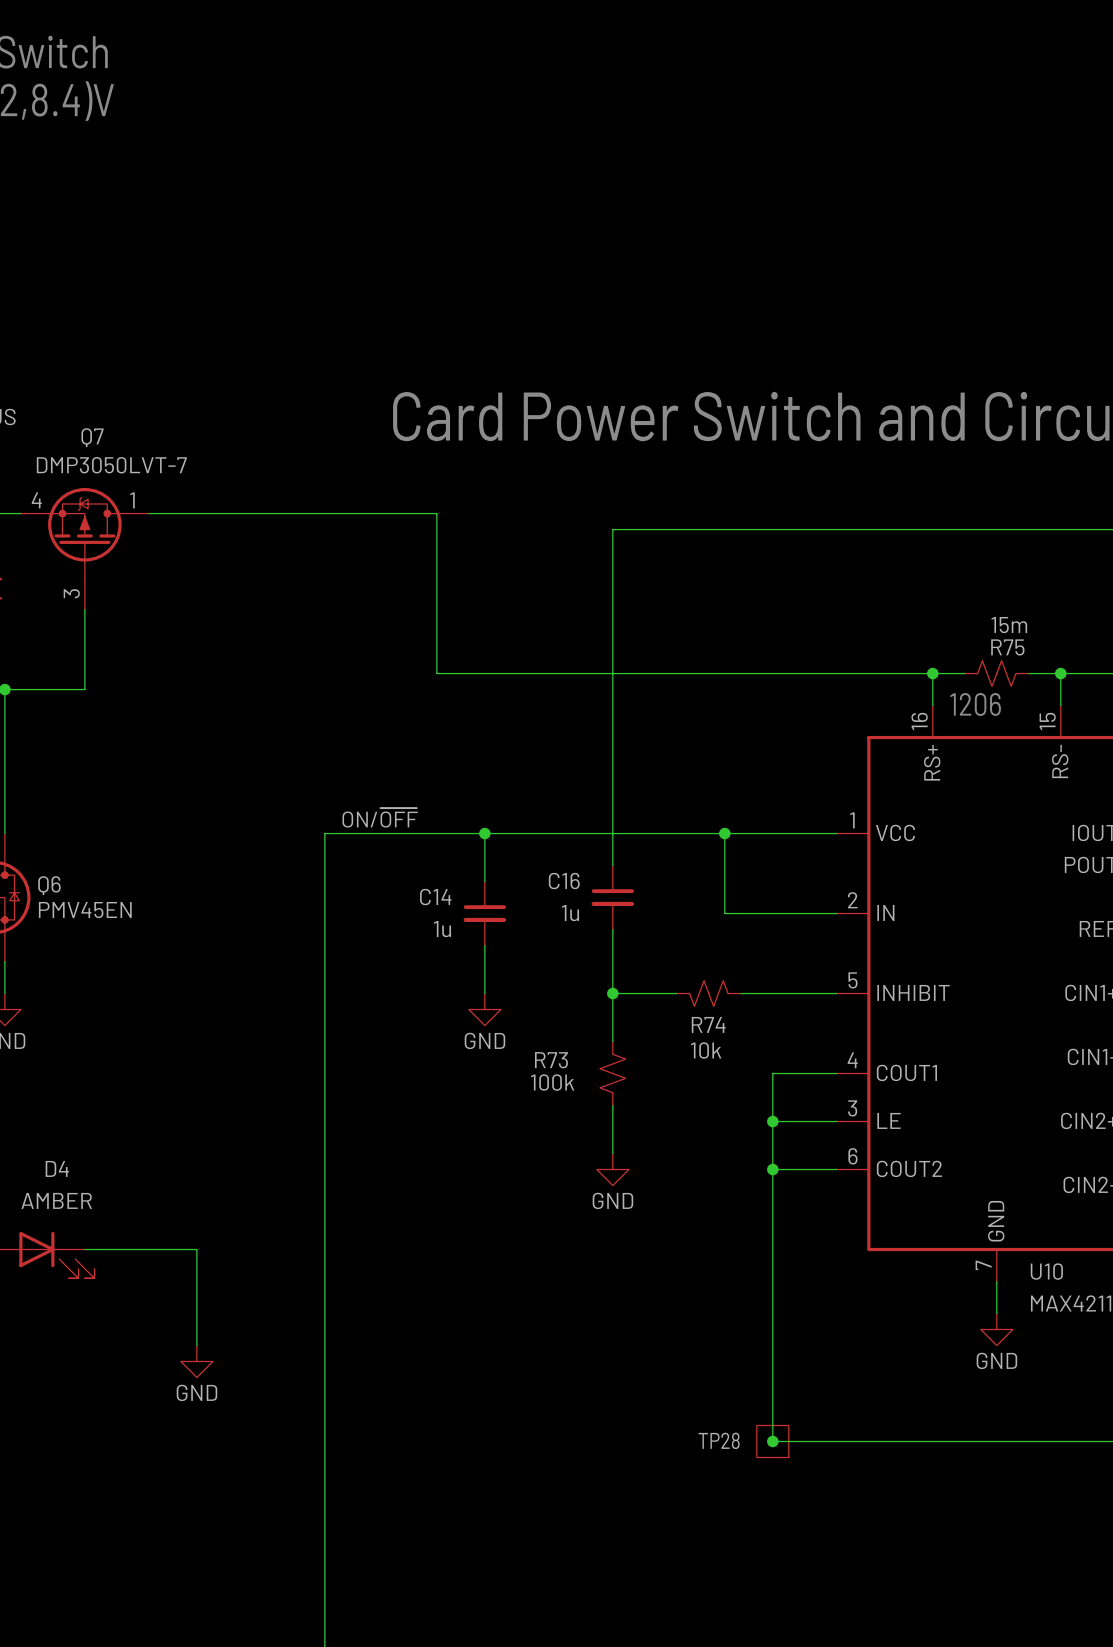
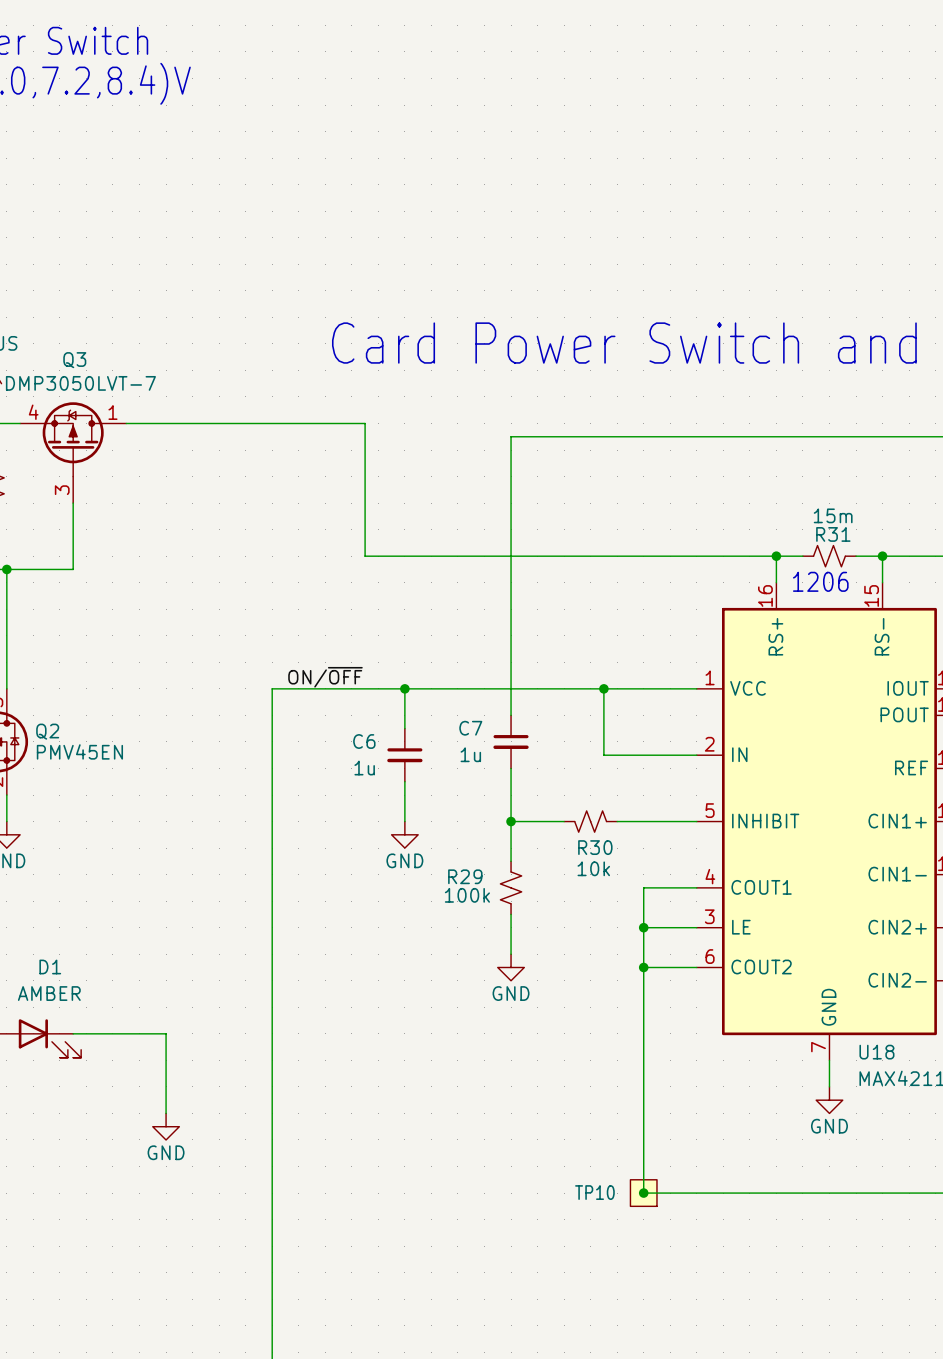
Q7 name: Q7 (92, 437) -> Q3 (74, 360)
R75 name: R75 (1007, 647) -> R31 (833, 534)
C16 name: C16 (564, 881) -> C7 (470, 728)
Q6 name: Q6 (49, 885) -> Q2 (47, 731)
C14 name: C14 (435, 897) -> C6 (364, 741)
R74 name: R74 (708, 1024) -> R30 (595, 847)
R73 name: R73 (551, 1060) -> R29 (465, 876)
D4 name: D4 (57, 1168) -> D1 (50, 967)
U10 name: U10 (1046, 1271) -> U18 (876, 1052)
TP28 name: TP28 (719, 1440) -> TP10 (594, 1192)

